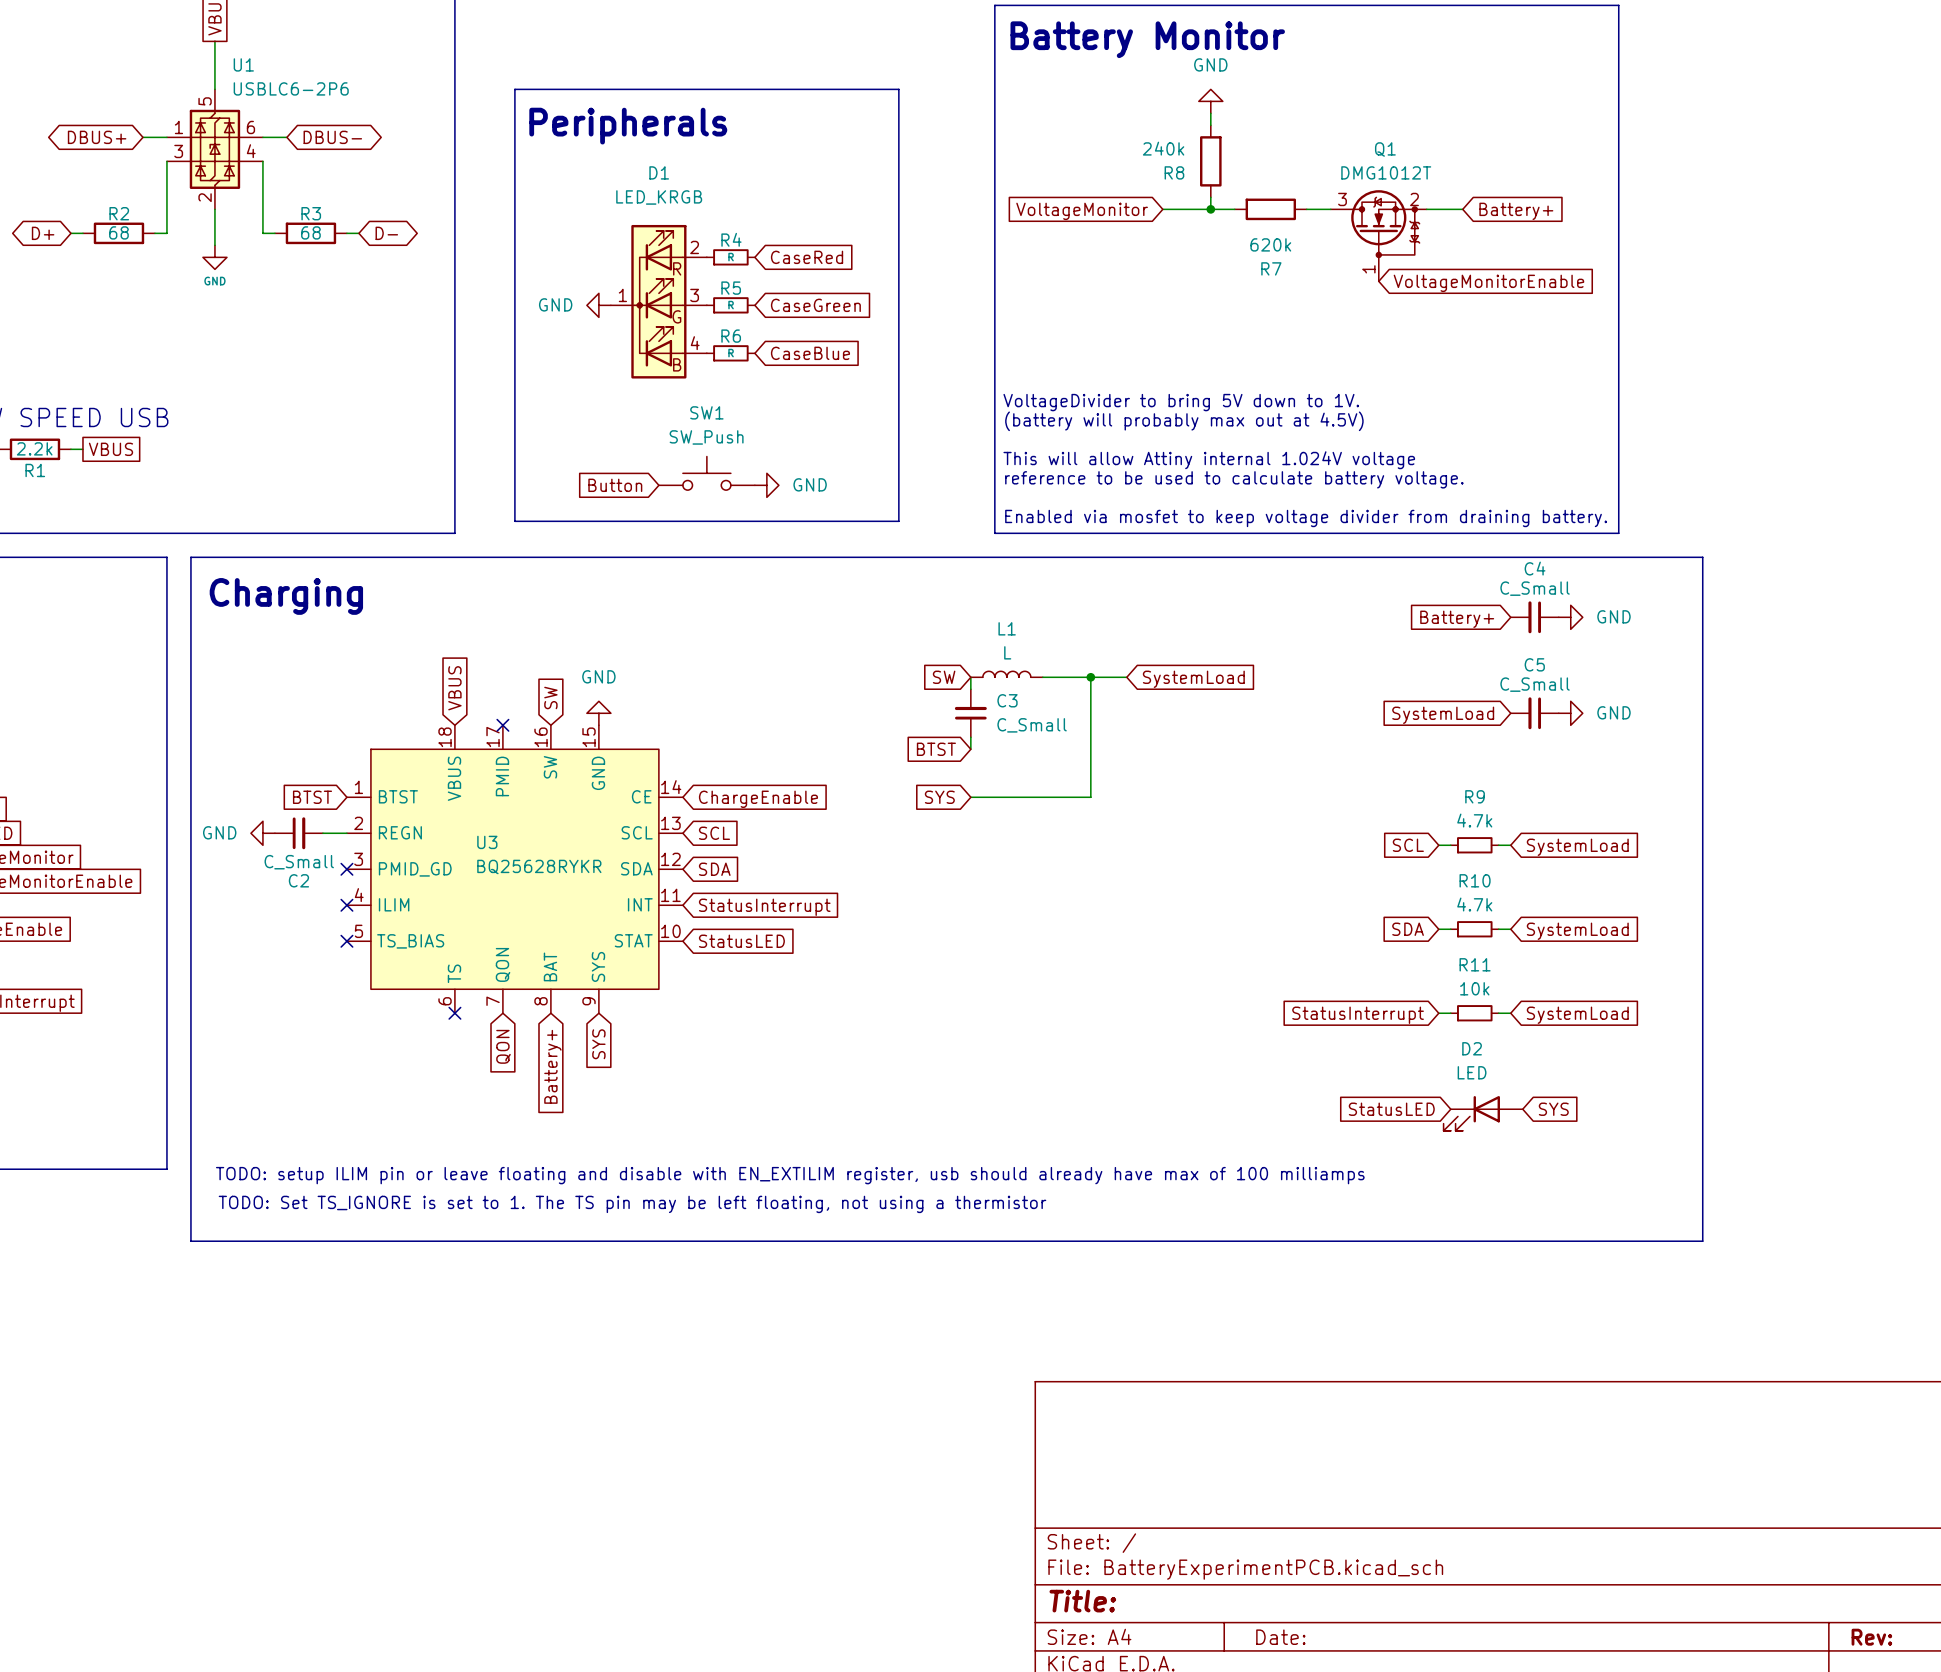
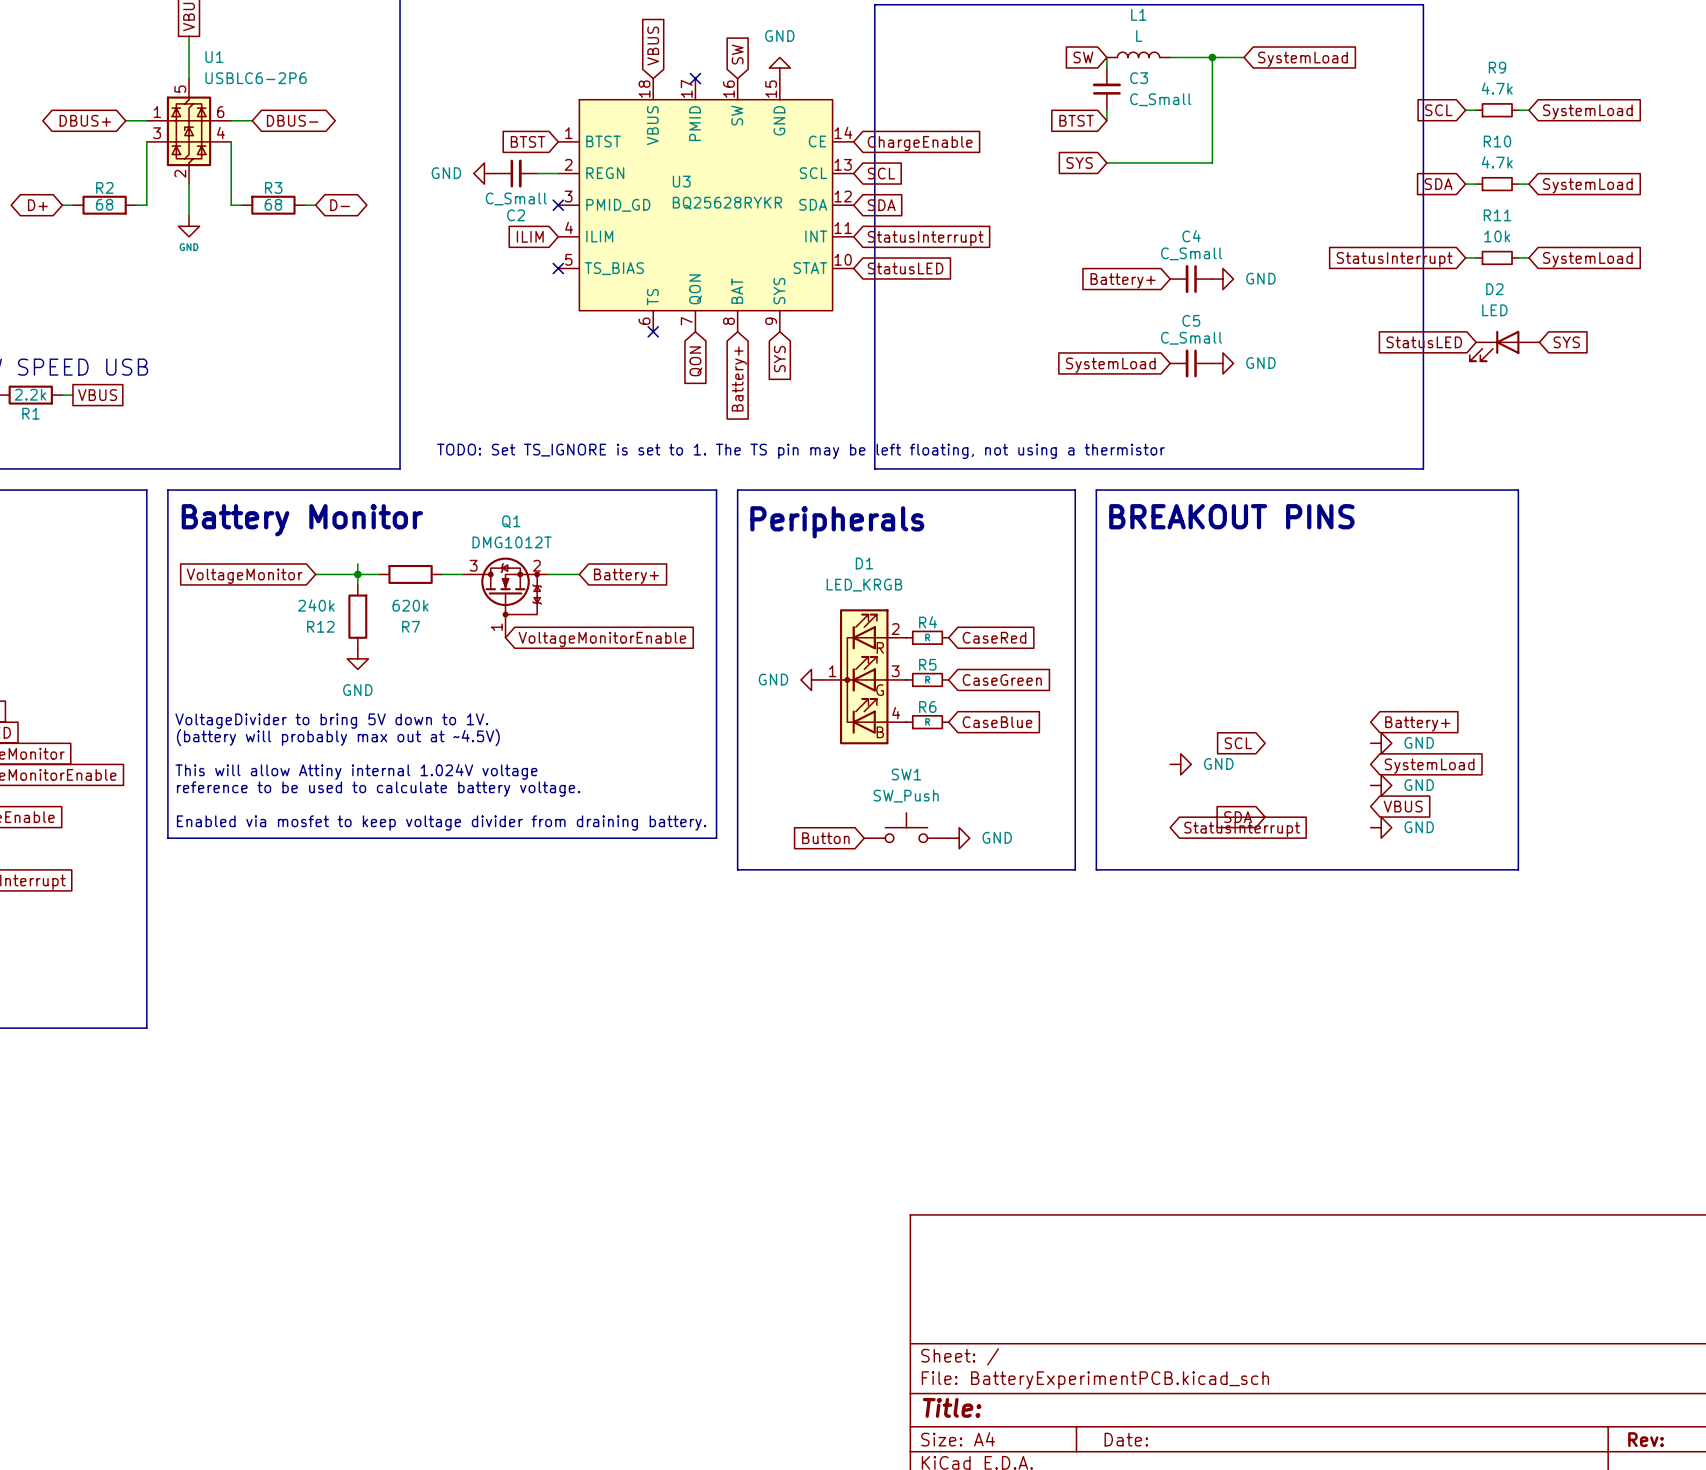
text: Battery Monitor (1147, 39) -> none
global label: none -> VBUS (653, 46)
global label: none -> SW (737, 54)
global label: none -> SW (1083, 57)
wire: none -> (1170, 57) (1244, 57)
wire: none -> (1212, 57) (1212, 162) (1106, 162)
junction: none -> (1212, 57)
global label: none -> SystemLoad (1302, 59)
power symbol: none -> GND (779, 68)
line: (514, 89) (898, 89) (898, 521) (514, 521) (514, 89) -> none
no-connect mark: none -> (695, 78)
power symbol: GND (1210, 101) -> none
wire: (1210, 113) (1210, 125) -> (1106, 110) (1106, 120)
global label: none -> SCL (1438, 110)
wire: none -> (1465, 110) (1476, 110)
wire: none -> (1518, 110) (1528, 110)
text: Peripherals (628, 126) -> none
global label: none -> SystemLoad (1587, 112)
global label: none -> BTST (1076, 120)
global label: none -> BTST (527, 141)
R8: 240k (1210, 161) -> none
global label: none -> ChargeEnable (920, 143)
global label: none -> SYS (1079, 162)
wire: none -> (537, 173) (558, 173)
global label: none -> SCL (881, 173)
wire: (1210, 197) (1210, 209) -> (1106, 57) (1106, 68)
wire: (1162, 209) (1234, 209) -> none
junction: (1210, 209) -> none
R7 position: (1270, 209) -> (410, 574)
wire: (1306, 209) (1330, 209) -> none
wire: (1426, 209) (1462, 209) -> none
global label: none -> SDA (1438, 184)
wire: none -> (1465, 184) (1476, 184)
wire: none -> (1518, 184) (1528, 184)
global label: VoltageMonitor (1082, 211) -> none
global label rotation: 0° (1516, 211) -> 180° (1123, 280)
global label position: Battery+ (1516, 211) -> Battery+ (1123, 280)
global label: none -> SystemLoad (1587, 185)
no-connect mark: none -> (558, 205)
global label: none -> SDA (881, 205)
Q1 position: (1378, 235) -> (505, 597)
R4 position: (730, 257) -> (927, 637)
global label: CaseRed (807, 257) -> none
global label: none -> ILIM (530, 236)
global label: none -> StatusInterrupt (925, 238)
global label: VoltageMonitorEnable (1488, 283) -> none
wire: none -> (1465, 257) (1476, 257)
wire: none -> (1518, 257) (1528, 257)
global label: none -> StatusInterrupt (1394, 259)
global label: none -> SystemLoad (1587, 259)
D1 position: (658, 301) -> (864, 676)
power symbol position: GND (598, 305) -> GND (484, 173)
no-connect mark: none -> (558, 268)
R5 position: (730, 305) -> (927, 679)
global label: CaseGreen (815, 305) -> none
global label: none -> StatusLED (905, 268)
power symbol: none -> GND (1222, 279)
R6 position: (730, 353) -> (927, 722)
global label: CaseBlue (810, 353) -> none
no-connect mark: none -> (653, 331)
global label: none -> StatusLED (1424, 342)
global label: none -> SYS (1566, 342)
text: VoltageDivider to bring 5V down to 1V. (1181, 402) -> none
global label: none -> SYS (779, 359)
global label: none -> QON (695, 361)
power symbol: none -> GND (1222, 363)
global label: none -> SystemLoad (1110, 365)
text: (battery will probably max out at 4.5V) (1184, 421) -> none
global label: none -> Battery+ (739, 378)
text: This will allow Attiny internal 1.024V voltage (1209, 460) -> none
SW1 position: (706, 473) -> (906, 827)
text: reference to be used to calculate battery voltage. (1234, 479) -> none
global label: Button (615, 485) -> none
power symbol: GND (766, 485) -> none
text: none -> TODO: Set TS_IGNORE is set to 1. The TS pin may be left floating, not using a thermistor (800, 451)
text: Enabled via mosfet to keep voltage divider from draining battery. (1306, 518) -> none
line: (814, 557) (838, 557) -> (716, 490) (716, 838) (167, 838)
line: (1222, 557) (1246, 557) -> (1075, 490) (1075, 869) (737, 869) (737, 490)
line: (1702, 557) (1702, 1241) (190, 1241) (190, 953) -> (1497, 490) (1518, 490) (1518, 869) (1096, 869) (1096, 490)
text: none -> BREAKOUT PINS (1231, 516)
text: none -> Battery Monitor (302, 520)
text: none -> Peripherals (837, 522)
text: Charging (286, 596) -> none
C4 position: (1534, 617) -> (1191, 279)
power symbol: GND (1570, 617) -> none
global label: Battery+ (1457, 619) -> none
wire: none -> (357, 563) (357, 585)
wire: none -> (315, 574) (378, 574)
junction: none -> (357, 574)
wire: none -> (442, 574) (463, 574)
wire: none -> (547, 574) (579, 574)
global label: none -> VoltageMonitor (244, 576)
global label: none -> Battery+ (626, 576)
L1 position: (1006, 674) -> (1138, 54)
global label: SW (944, 677) -> none
wire: (970, 677) (970, 689) -> none
wire: (1042, 677) (1126, 677) -> none
wire: (1090, 677) (1090, 797) (970, 797) -> none
junction: (1090, 677) -> none
global label: SystemLoad (1193, 679) -> none
global label: VBUS (454, 688) -> none
global label: SW (550, 697) -> none
R12: none -> 240k (357, 616)
power symbol: GND (598, 713) -> none
C3 position: (970, 713) -> (1106, 89)
C5 position: (1534, 713) -> (1191, 363)
power symbol: GND (1570, 713) -> none
global label: SystemLoad (1443, 715) -> none
no-connect mark: (502, 725) -> none
global label: none -> CaseRed (994, 637)
global label: none -> VoltageMonitorEnable (602, 639)
power symbol: none -> GND (357, 658)
global label: BTST (936, 749) -> none
power symbol: none -> GND (811, 679)
global label: none -> CaseGreen (1002, 679)
global label: BTST (312, 797) -> none
global label: SYS (939, 797) -> none
global label: ChargeEnable (758, 799) -> none
text: none -> VoltageDivider to bring 5V down to 1V. (331, 721)
global label: none -> CaseBlue (997, 722)
global label: none -> Battery+ (1417, 723)
power symbol: GND (262, 833) -> none
C2 position: (298, 833) -> (516, 173)
wire: (322, 833) (346, 833) -> none
global label: SCL (714, 833) -> none
text: none -> (battery will probably max out at ~4.5V) (338, 737)
wire: (1438, 845) (1450, 845) -> none
R9 position: (1474, 845) -> (1497, 110)
wire: (1498, 845) (1510, 845) -> none
power symbol: none -> GND (1381, 743)
global label position: SystemLoad (1577, 847) -> SystemLoad (1429, 766)
no-connect mark: (346, 869) -> none
U3 position: (514, 869) -> (705, 205)
global label: SDA (714, 869) -> none
power symbol: none -> GND (1180, 764)
text: none -> This will allow Attiny internal 1.024V voltage (356, 771)
power symbol: none -> GND (1381, 785)
text: none -> reference to be used to calculate battery voltage. (378, 789)
no-connect mark: (346, 905) -> none
global label: StatusInterrupt (764, 907) -> none
global label: none -> VBUS (1403, 806)
R10 position: (1474, 929) -> (1497, 184)
wire: (1498, 929) (1510, 929) -> none
global label: SystemLoad (1577, 931) -> none
text: none -> Enabled via mosfet to keep voltage divider from draining battery. (441, 823)
no-connect mark: (346, 941) -> none
global label: StatusLED (741, 941) -> none
power symbol: none -> GND (1381, 827)
global label: none -> Button (825, 838)
power symbol: none -> GND (959, 838)
no-connect mark: (454, 1013) -> none
wire: (1438, 1013) (1450, 1013) -> none
R11 position: (1474, 1013) -> (1497, 257)
wire: (1498, 1013) (1510, 1013) -> none
global label rotation: 0° (1358, 1015) -> 180° (1242, 829)
global label: SystemLoad (1577, 1015) -> none
global label: SYS (598, 1044) -> none
global label: QON (503, 1046) -> none
global label: Battery+ (552, 1066) -> none
global label: StatusLED (1391, 1109) -> none
global label: SYS (1553, 1109) -> none
D2 position: (1483, 1113) -> (1504, 346)
text: TODO: setup ILIM pin or leave floating and disable with EN_EXTILIM register, usb should already have max of 100 milliamps (790, 1175) -> none
text: TODO: Set TS_IGNORE is set to 1. The TS pin may be left floating, not using a thermistor (632, 1204) -> none

